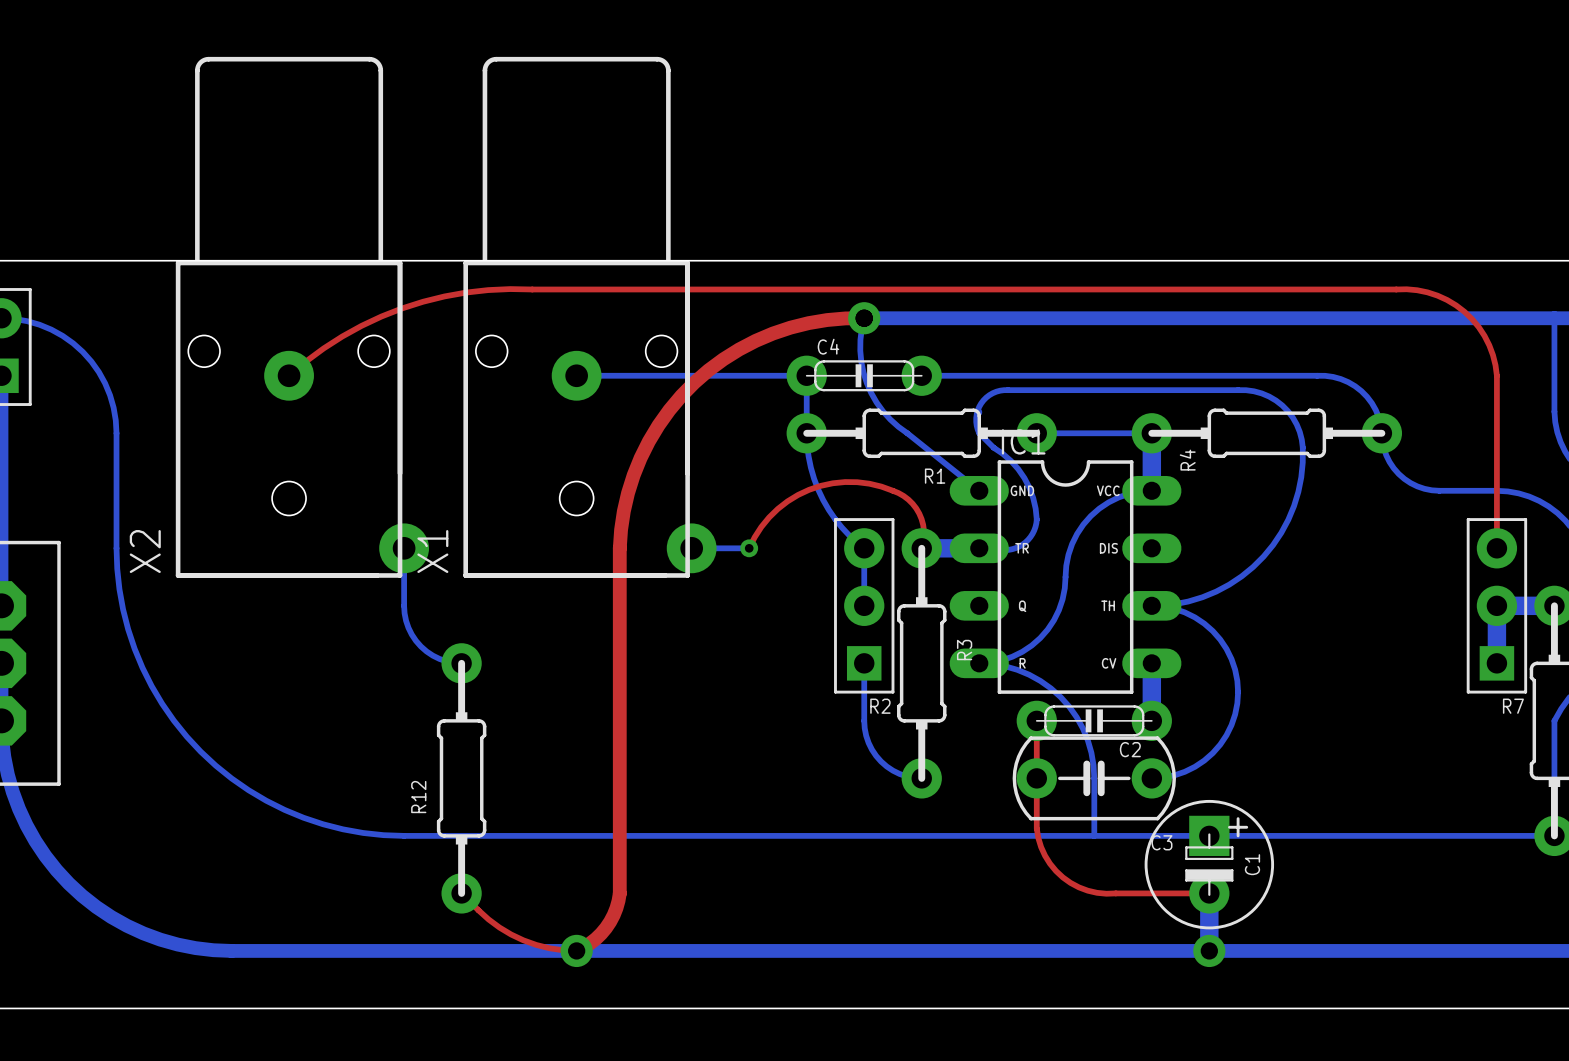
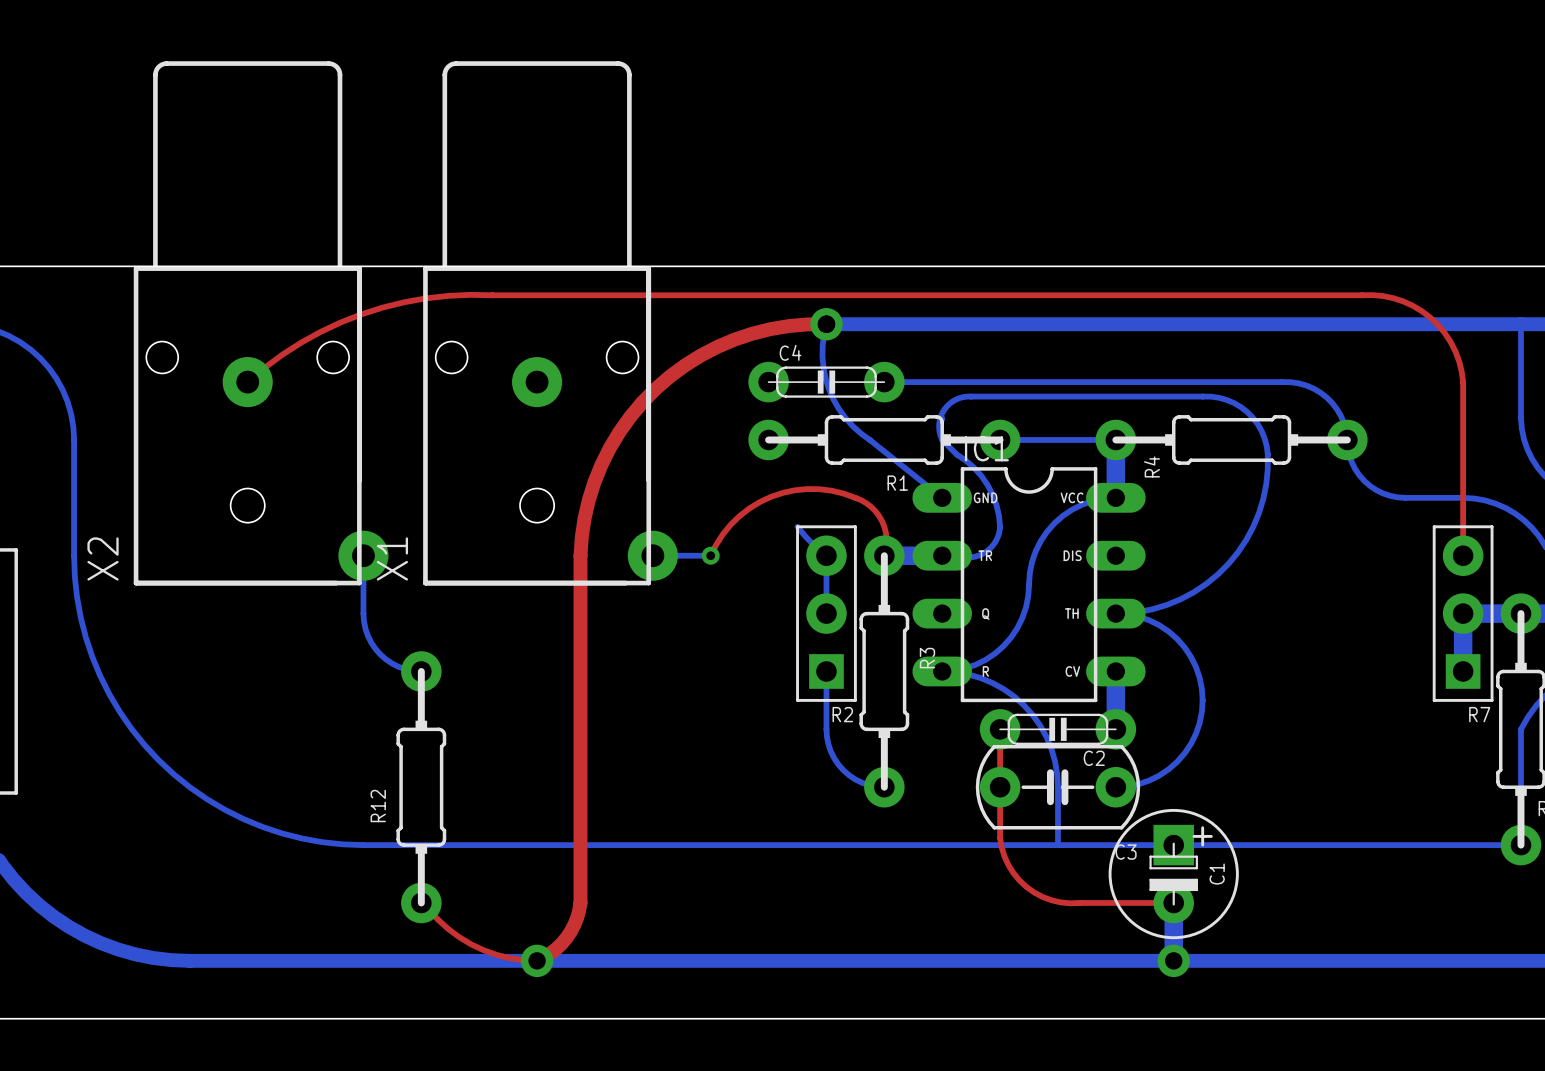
bottom track: (576, 375) (806, 375) (808, 456) (818, 489) (835, 519) -> none

